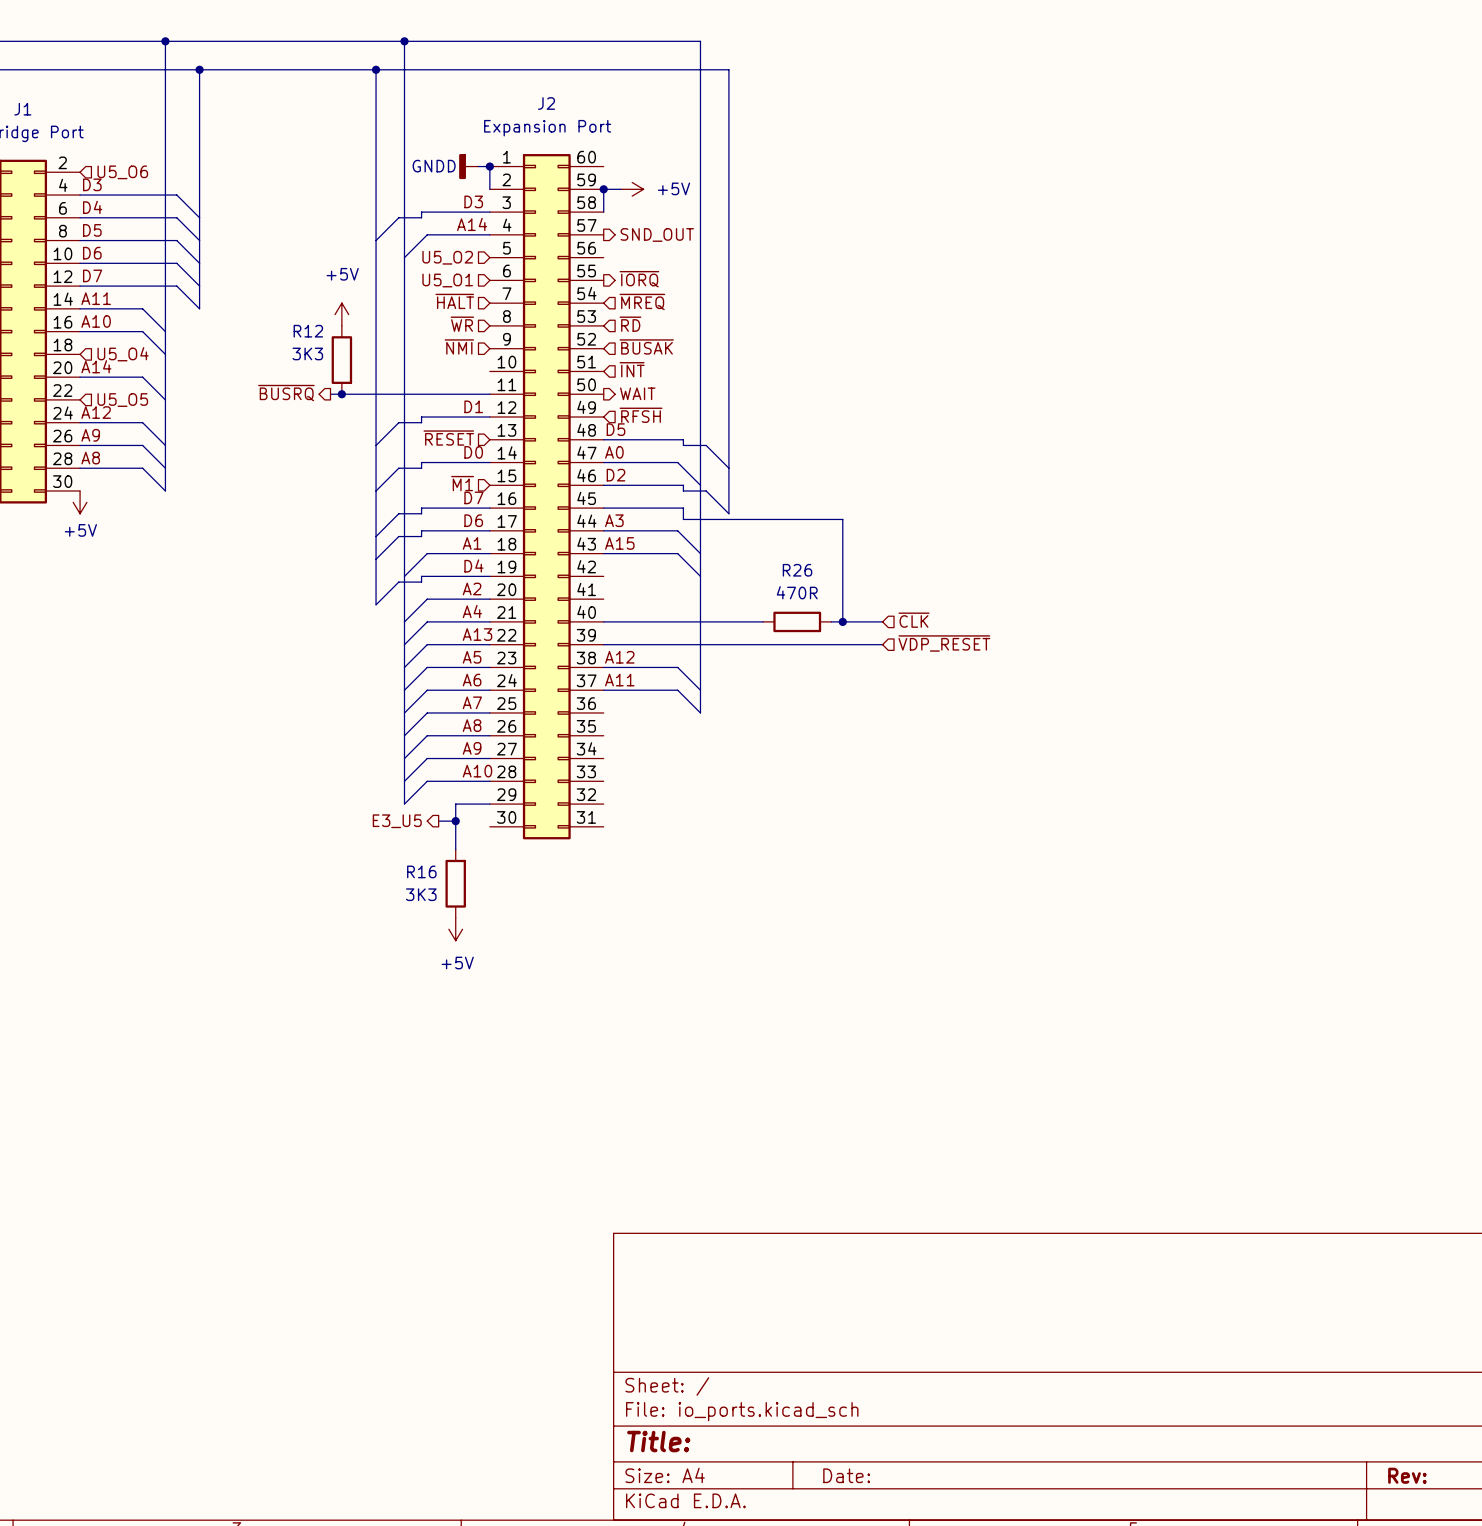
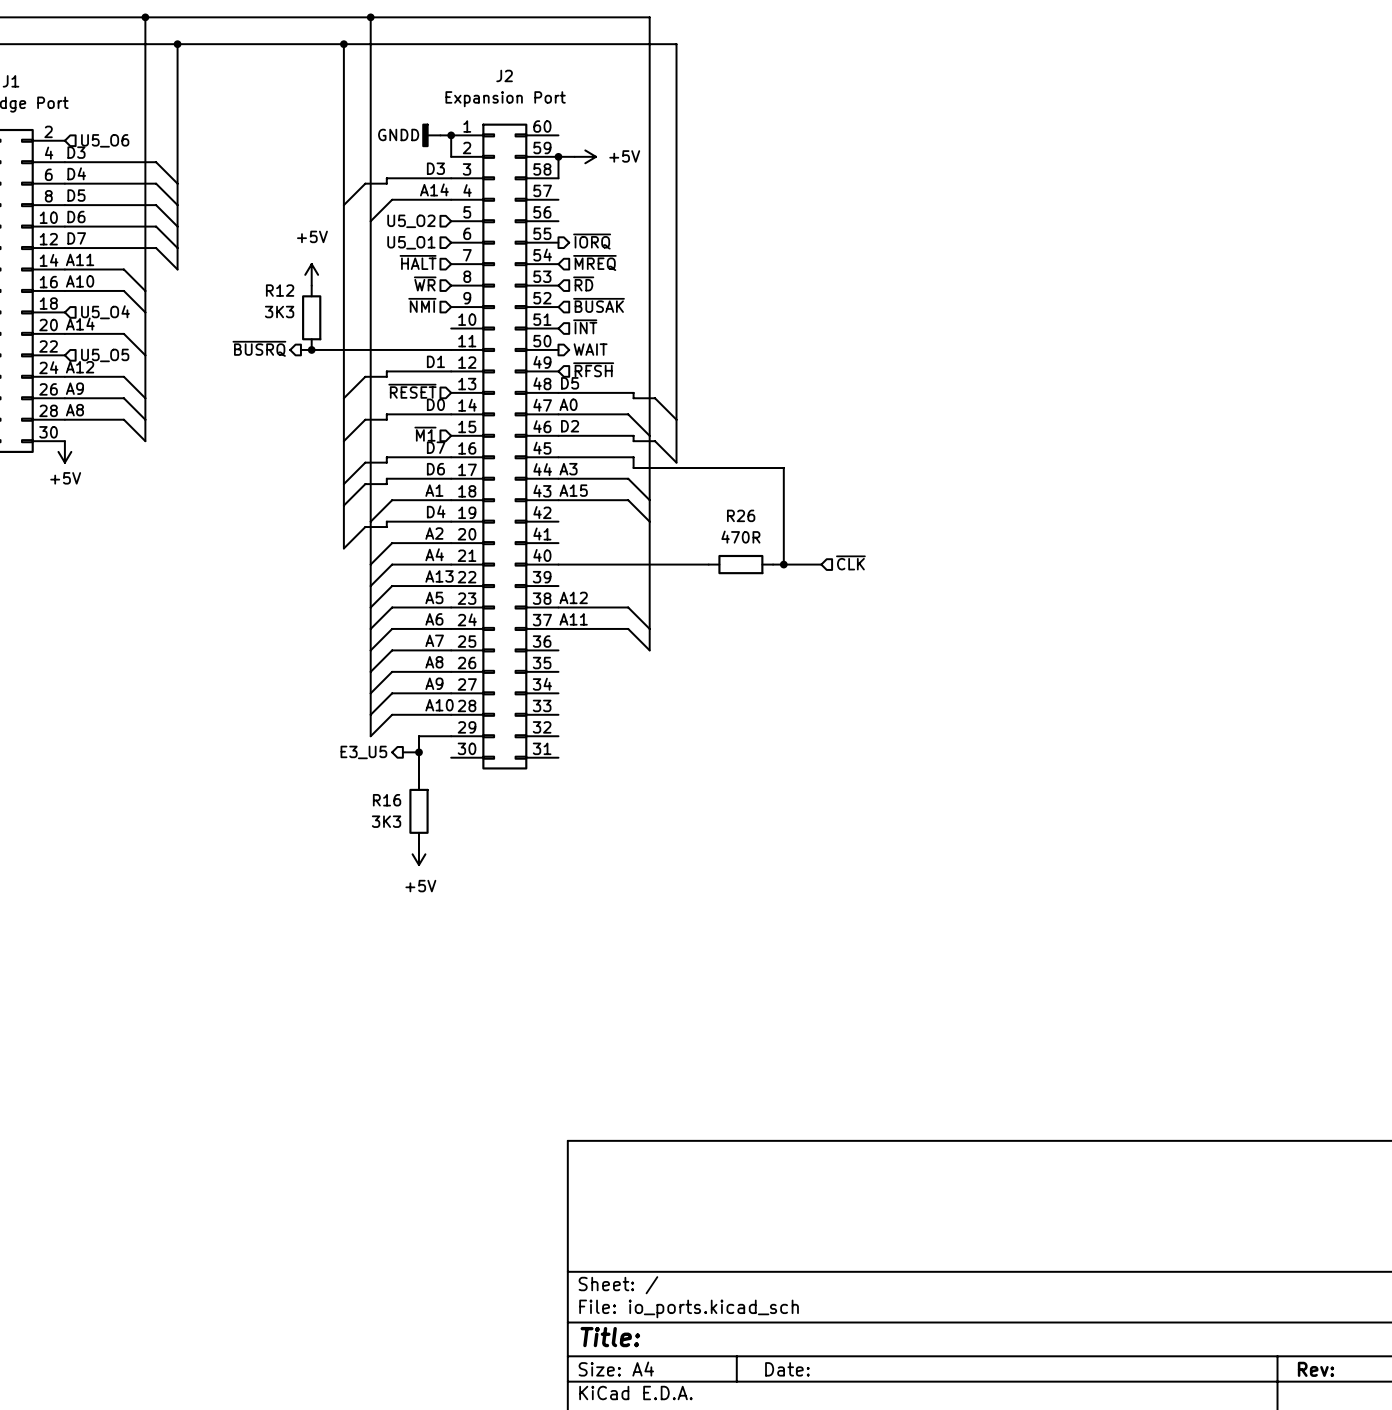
hierarchical label: SND_OUT (657, 234) -> none
hierarchical label: ~{VDP_RESET} (944, 643) -> none
wire: (603, 644) (882, 644) -> none

